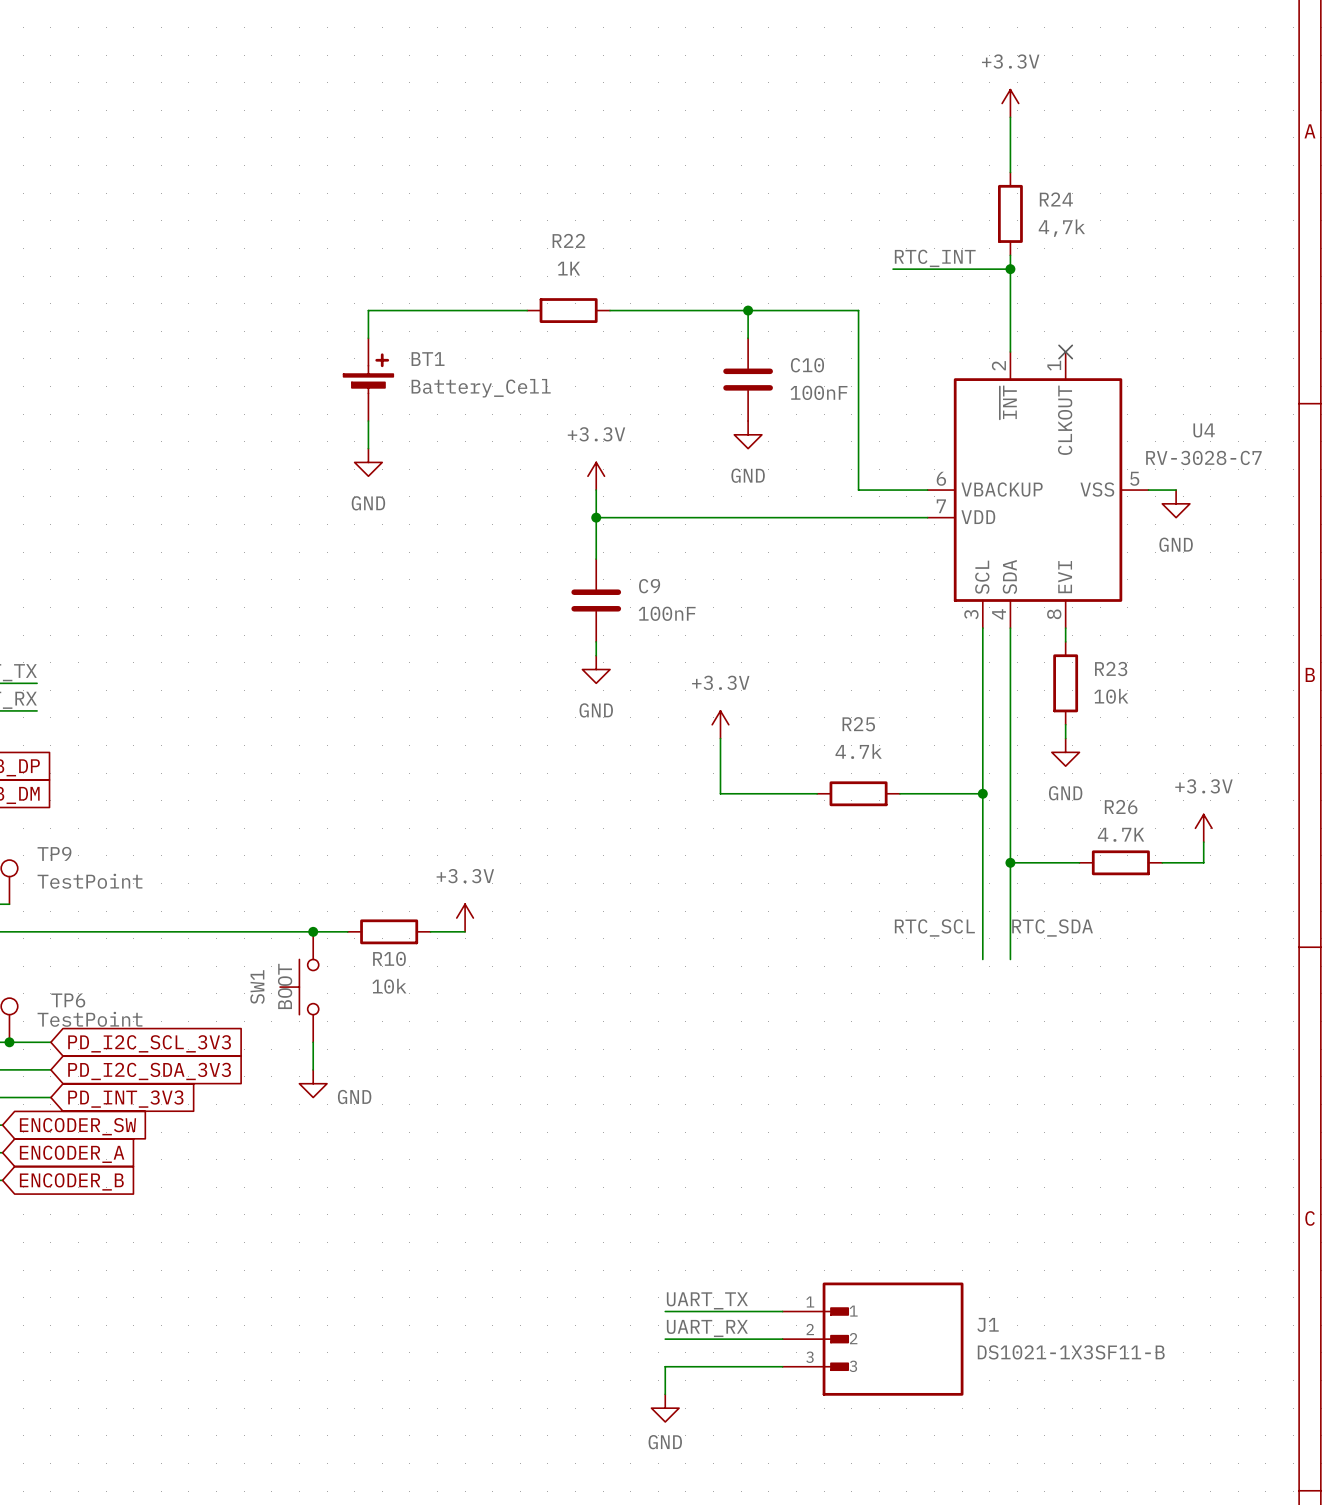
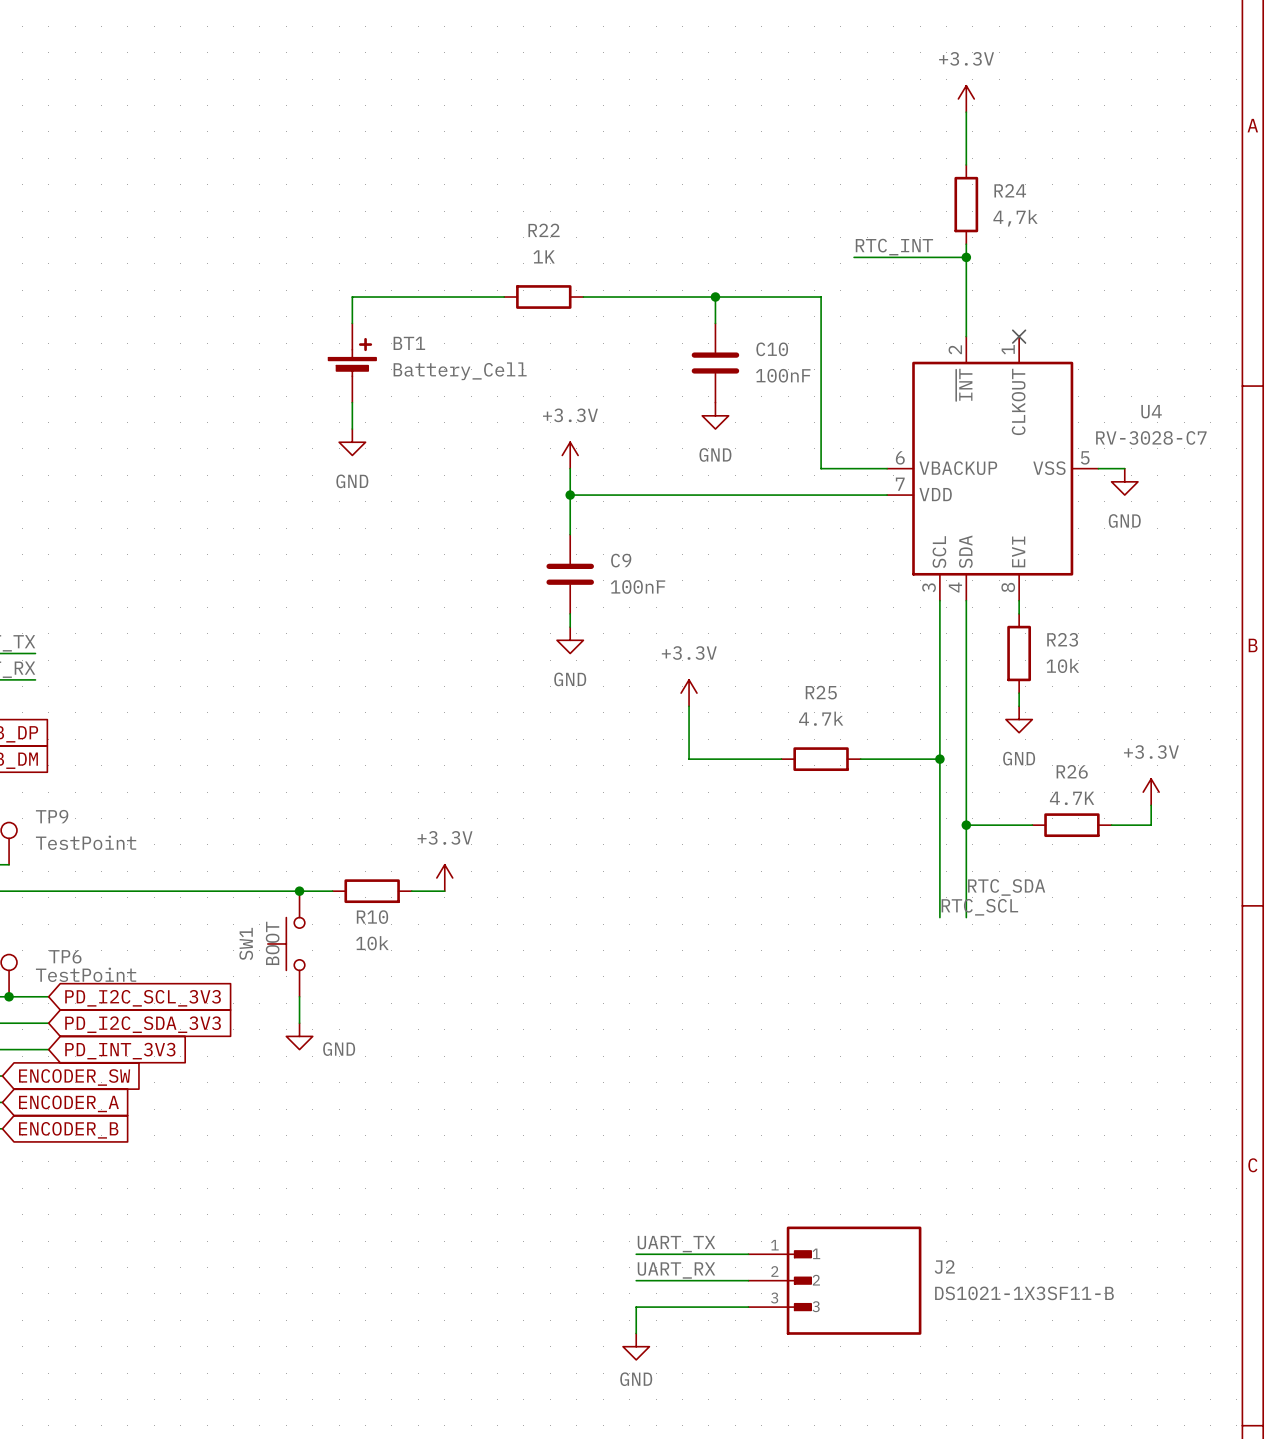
label position: RTC_SCL (934, 927) -> RTC_SCL (979, 907)
J1 name: J1 (988, 1324) -> J2 (944, 1266)

